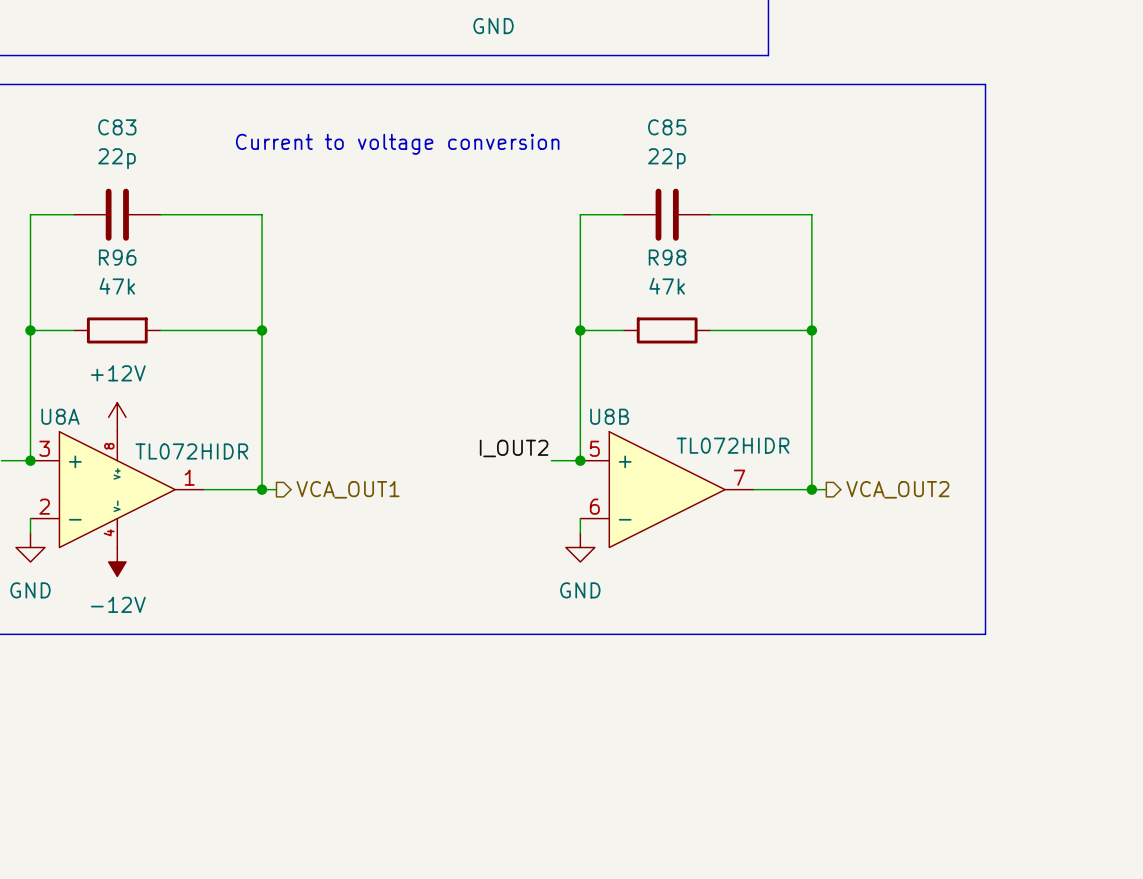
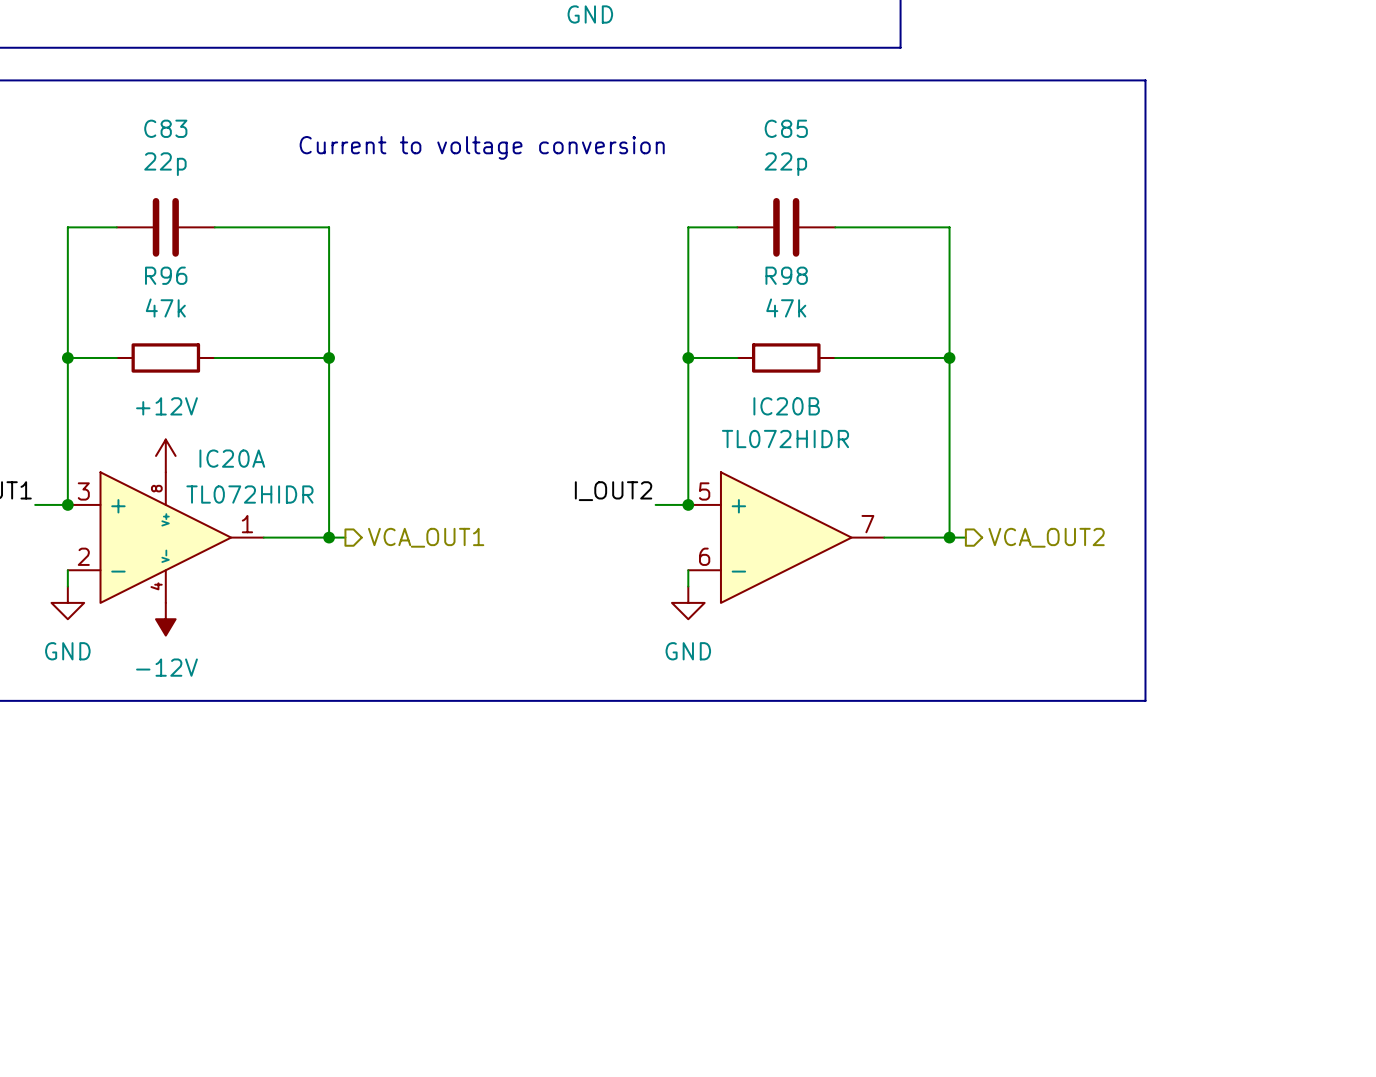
U8A name: U8A (60, 416) -> IC20A (232, 458)
U8B name: U8B (609, 416) -> IC20B (786, 406)
U8B value position: TL072HIDR (733, 445) -> TL072HIDR (785, 439)

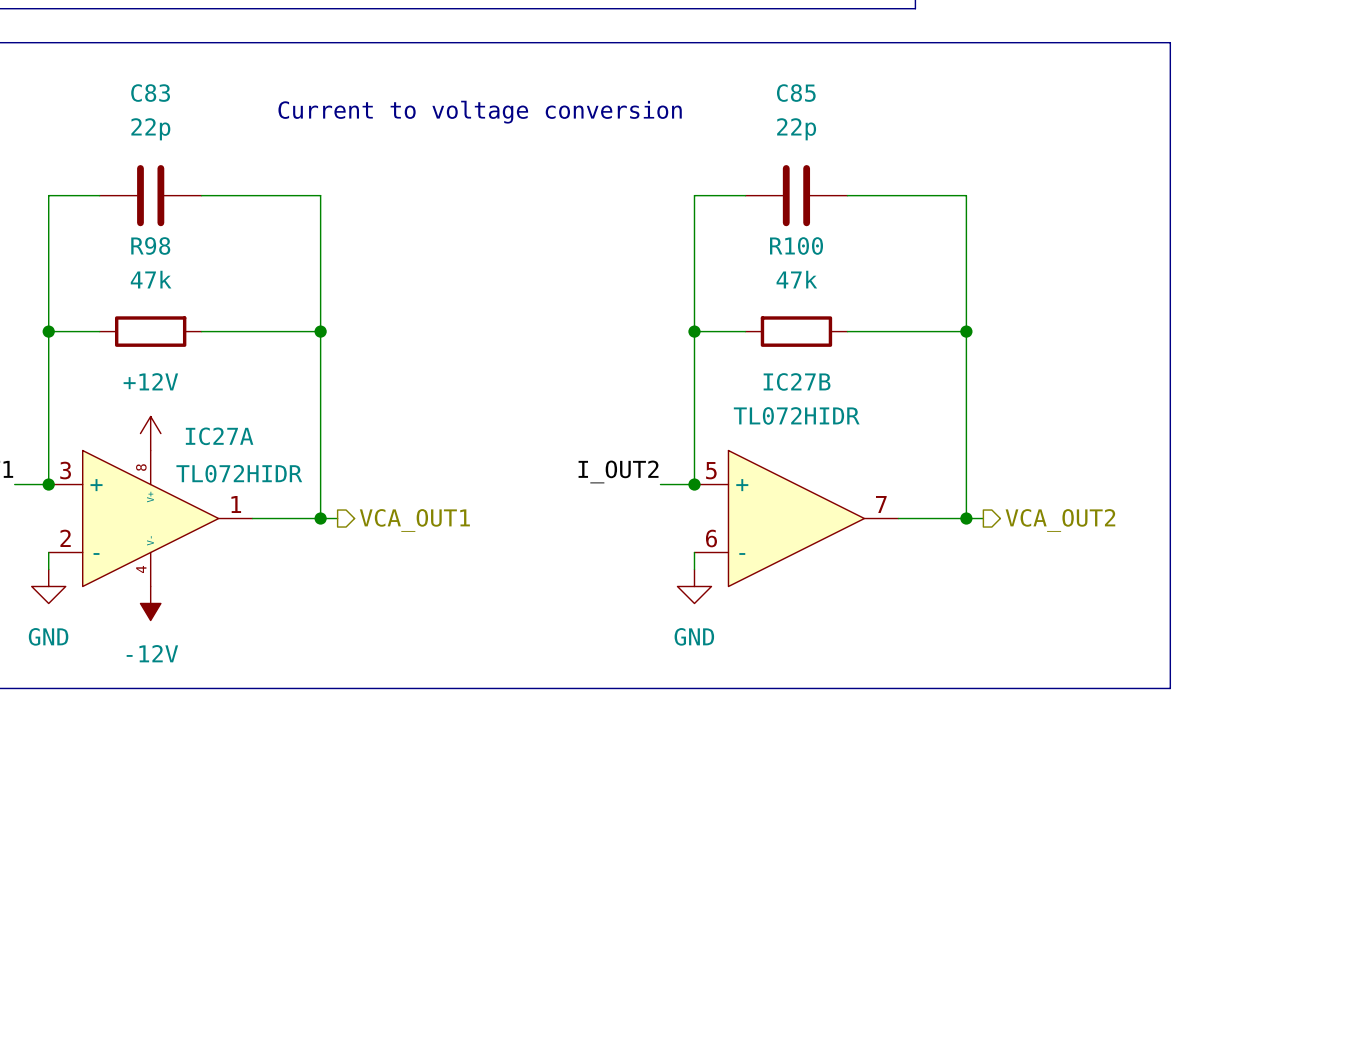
R96 name: R96 (166, 275) -> R98 (150, 245)
R98 name: R98 (786, 275) -> R100 (796, 245)
IC20B name: IC20B (786, 406) -> IC27B (797, 381)
IC20A name: IC20A (232, 458) -> IC27A (219, 436)

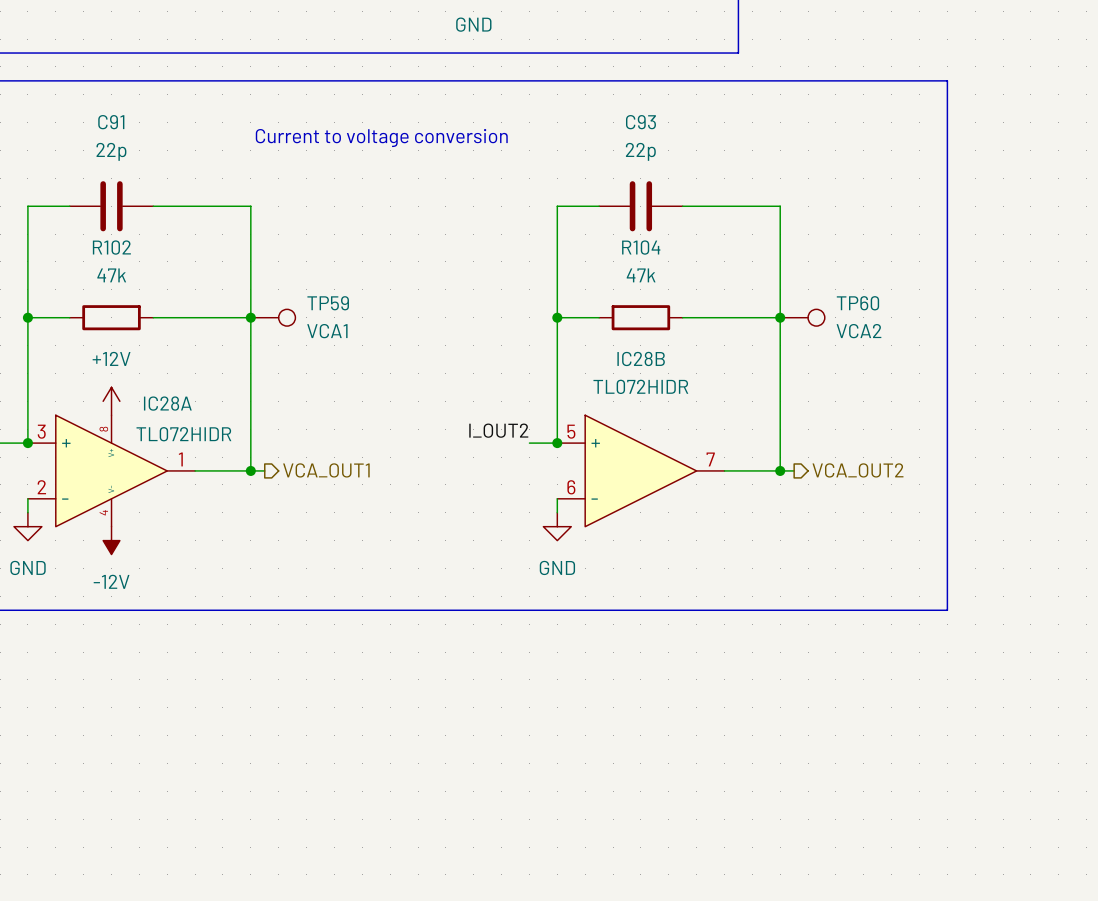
C83 name: C83 (150, 93) -> C91 (111, 122)
C85 name: C85 (796, 93) -> C93 (640, 122)
R98 name: R98 (150, 245) -> R102 (111, 247)
R100 name: R100 (796, 245) -> R104 (641, 247)
TP59: none -> VCA1 (273, 317)
TP60: none -> VCA2 (802, 317)
IC27B name: IC27B (797, 381) -> IC28B (641, 358)
IC27A name: IC27A (219, 436) -> IC28A (167, 403)

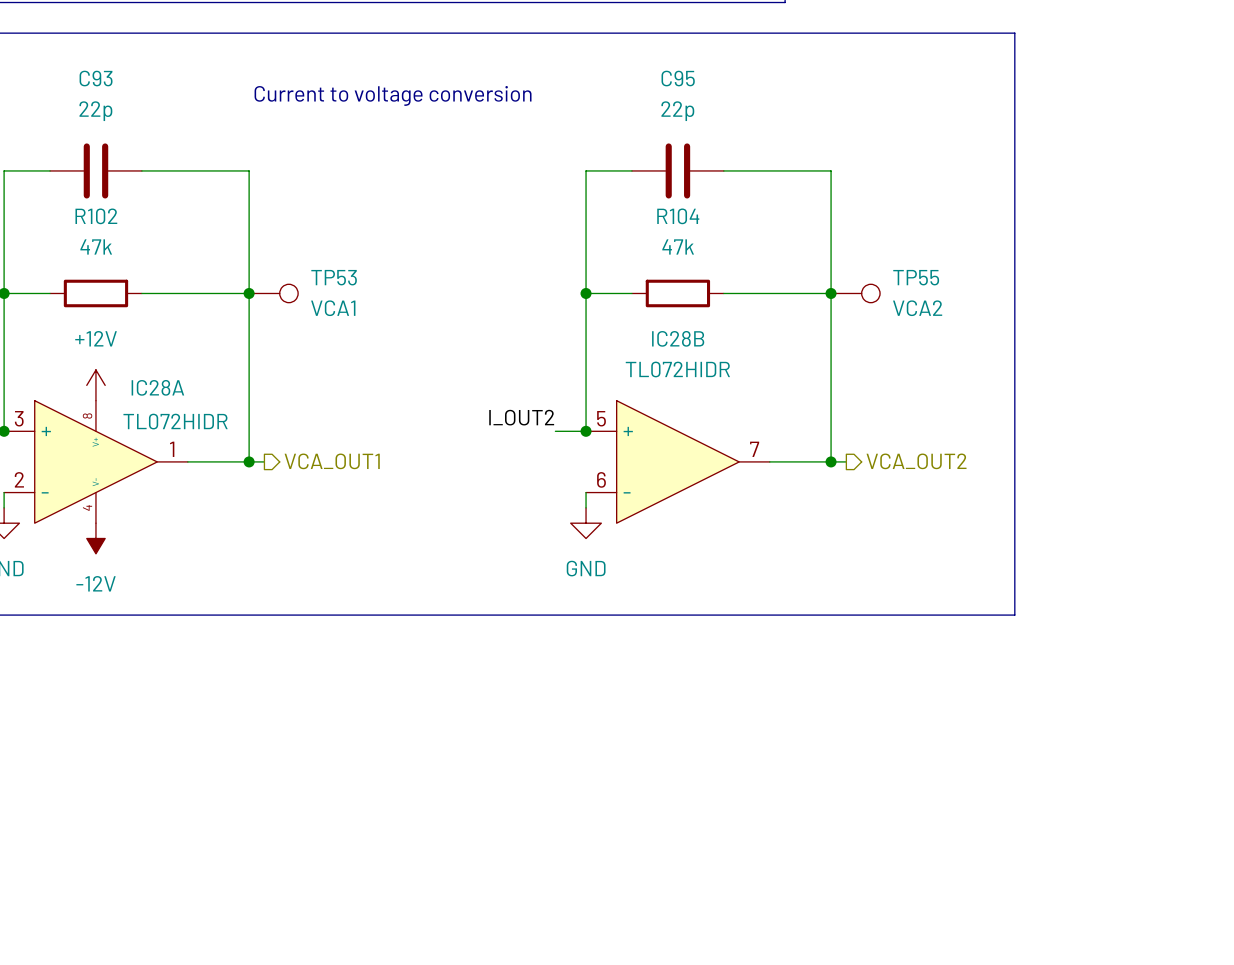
C91 name: C91 (111, 122) -> C93 (96, 78)
C93 name: C93 (640, 122) -> C95 (678, 78)
TP59 name: TP59 (328, 303) -> TP53 (334, 277)
TP60 name: TP60 (857, 303) -> TP55 (916, 277)

